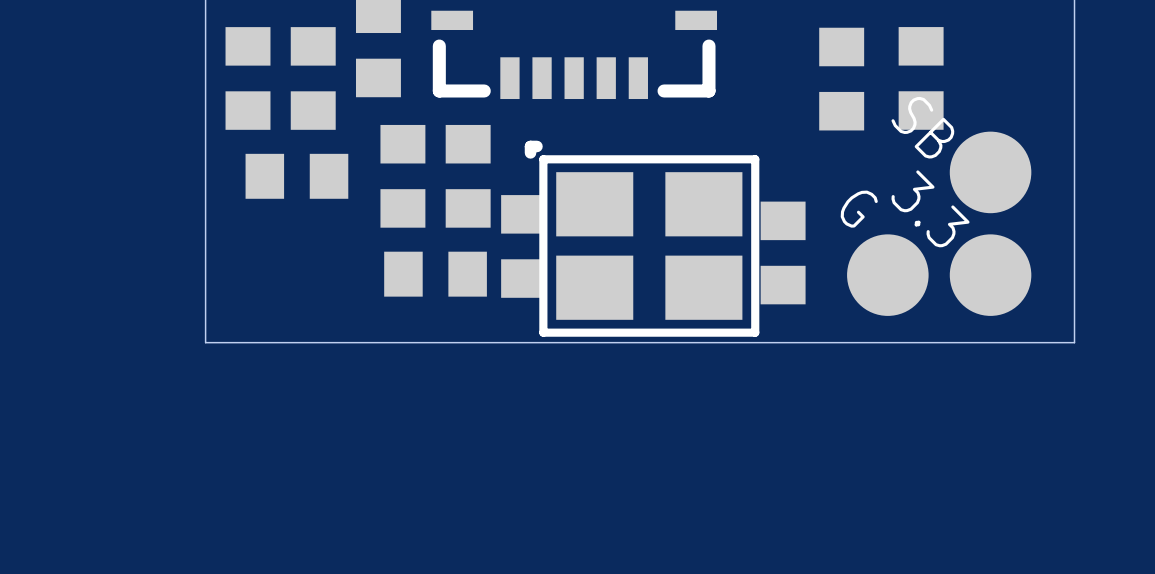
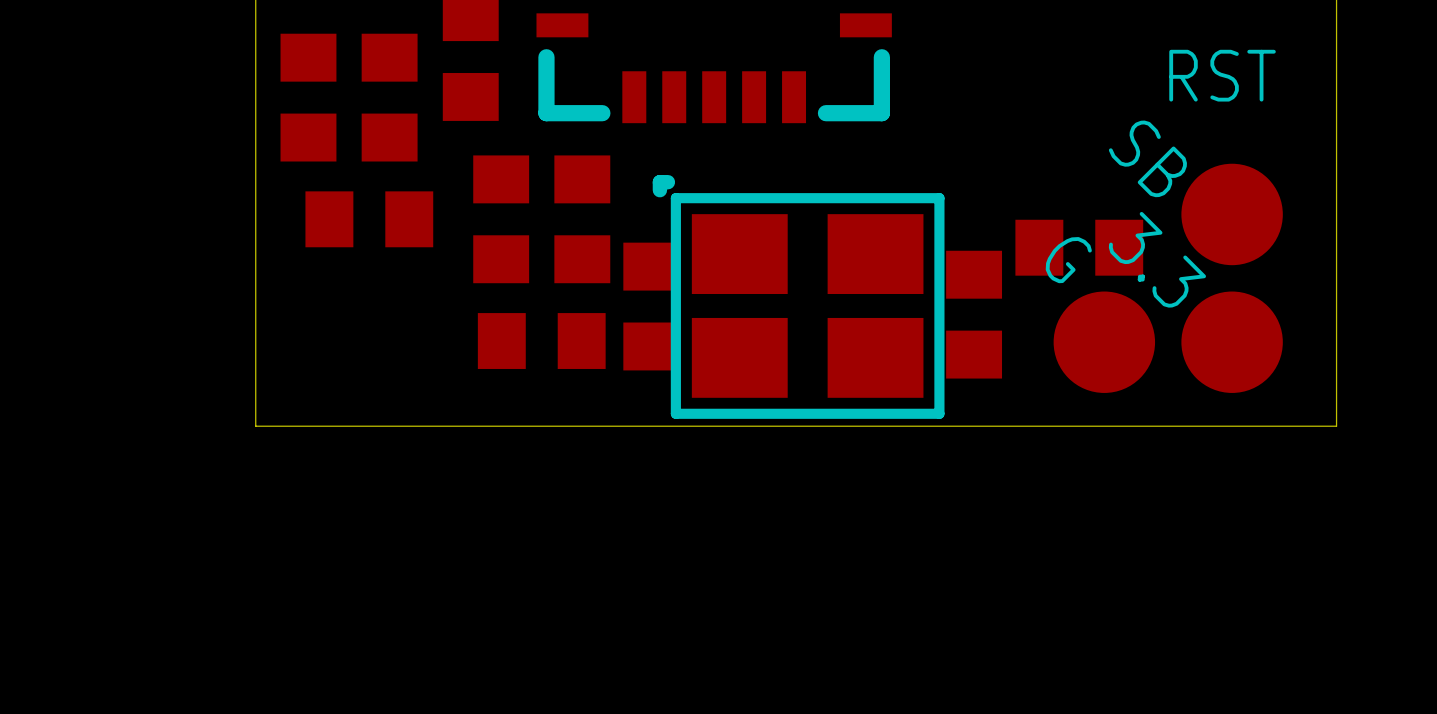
text: none -> RST (1222, 75)
part: (921, 78) -> none
part: (841, 79) -> none
part: none -> (1079, 247)

